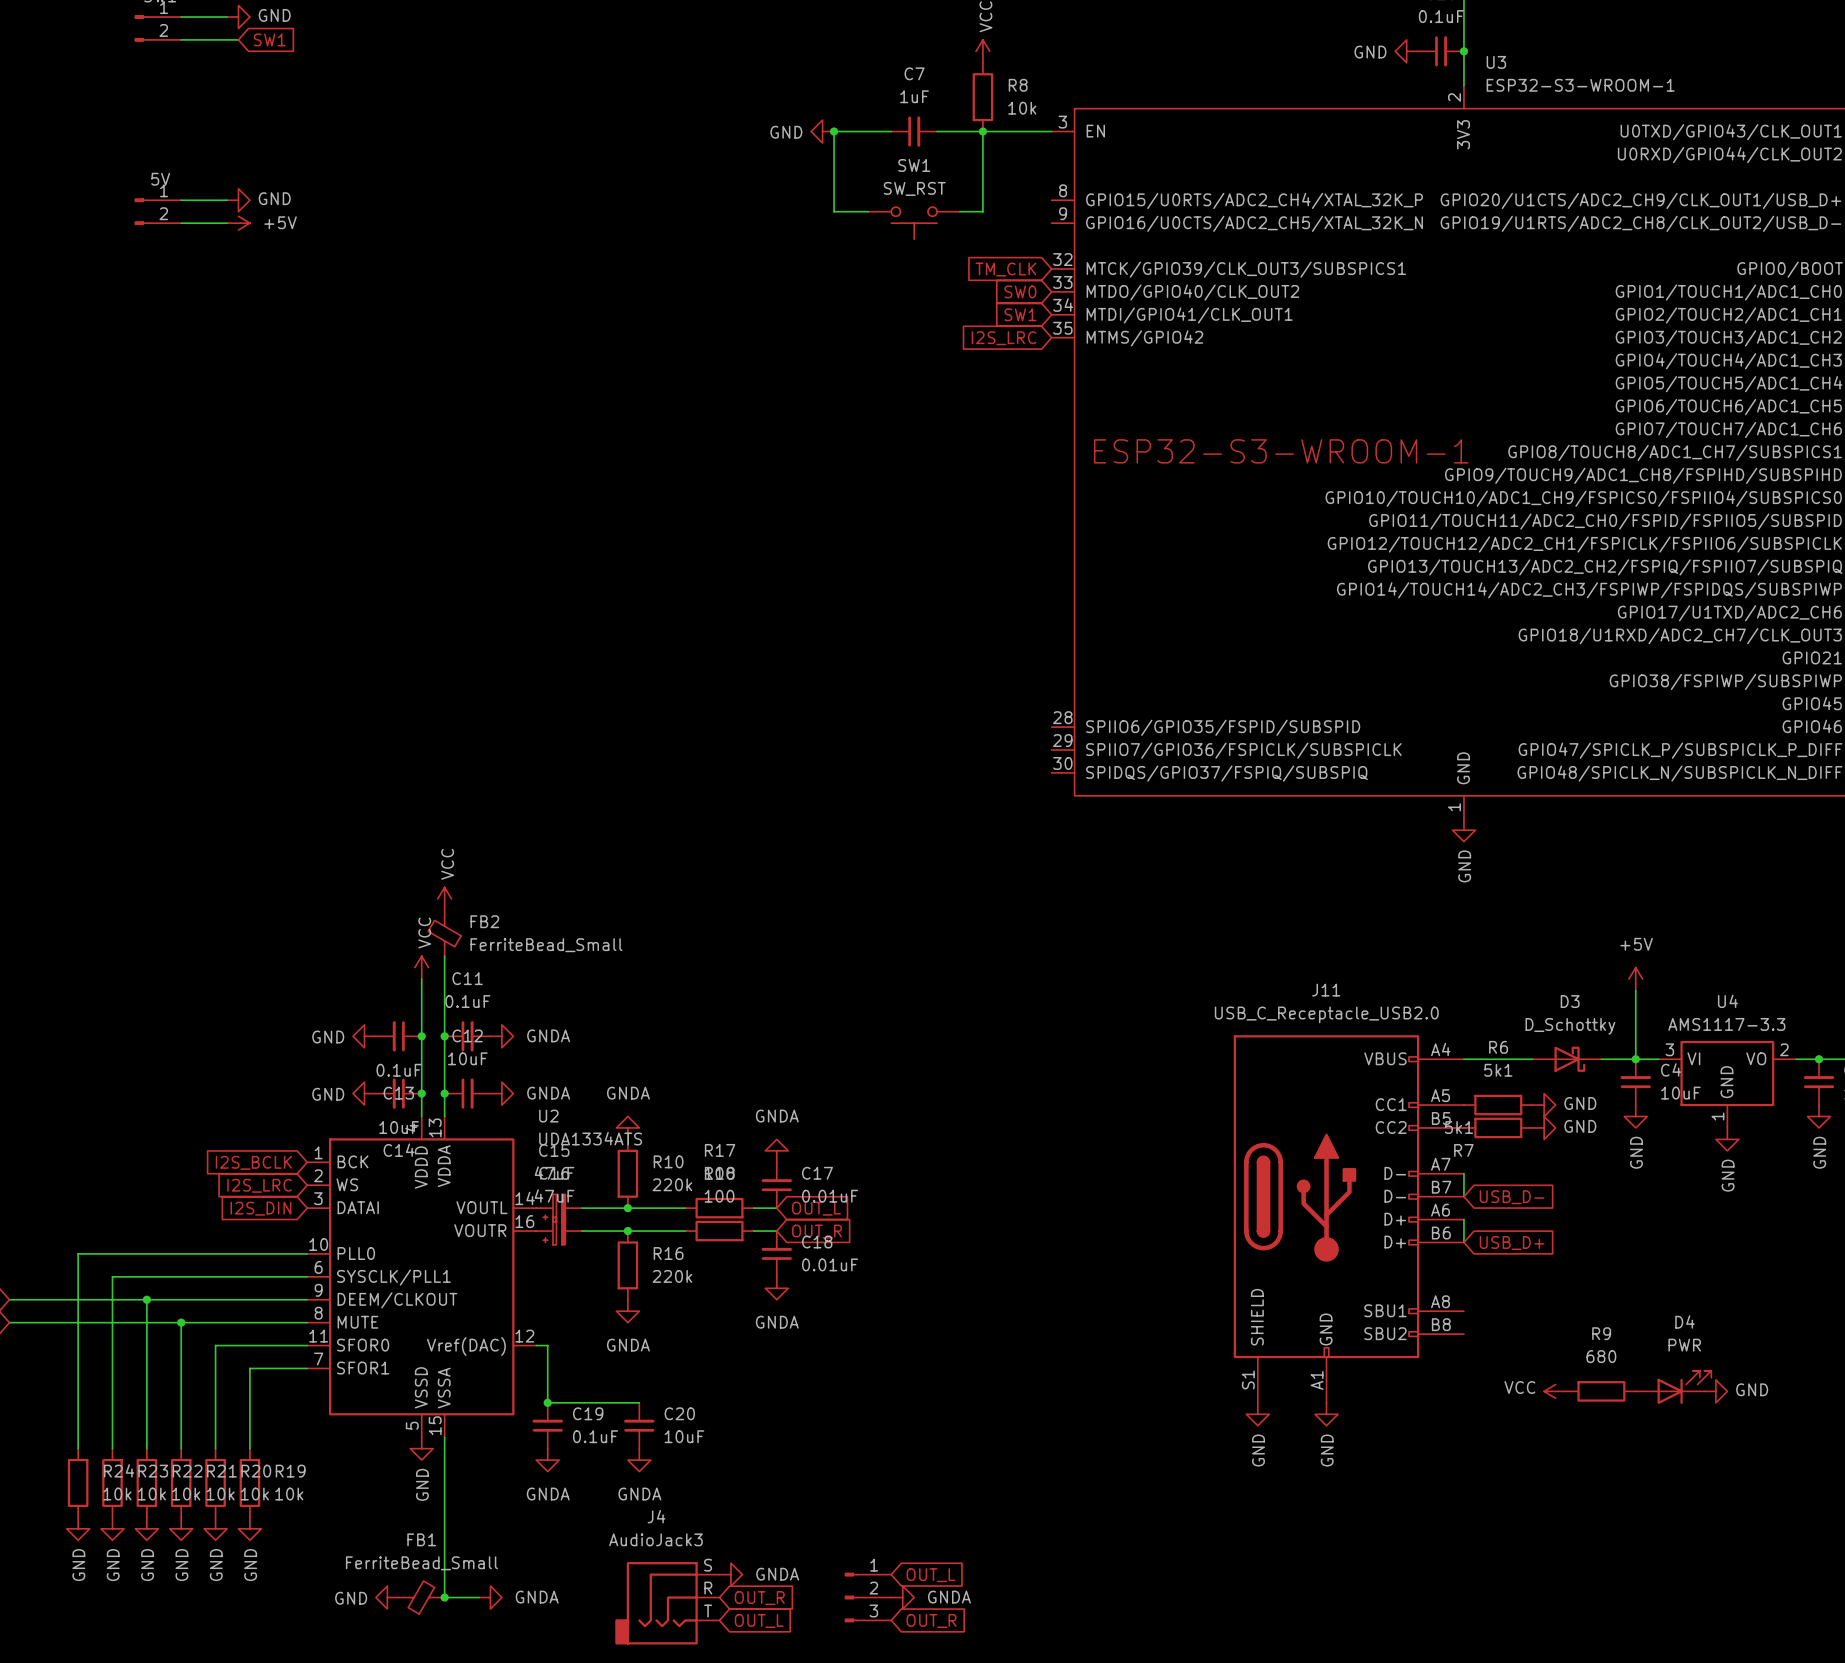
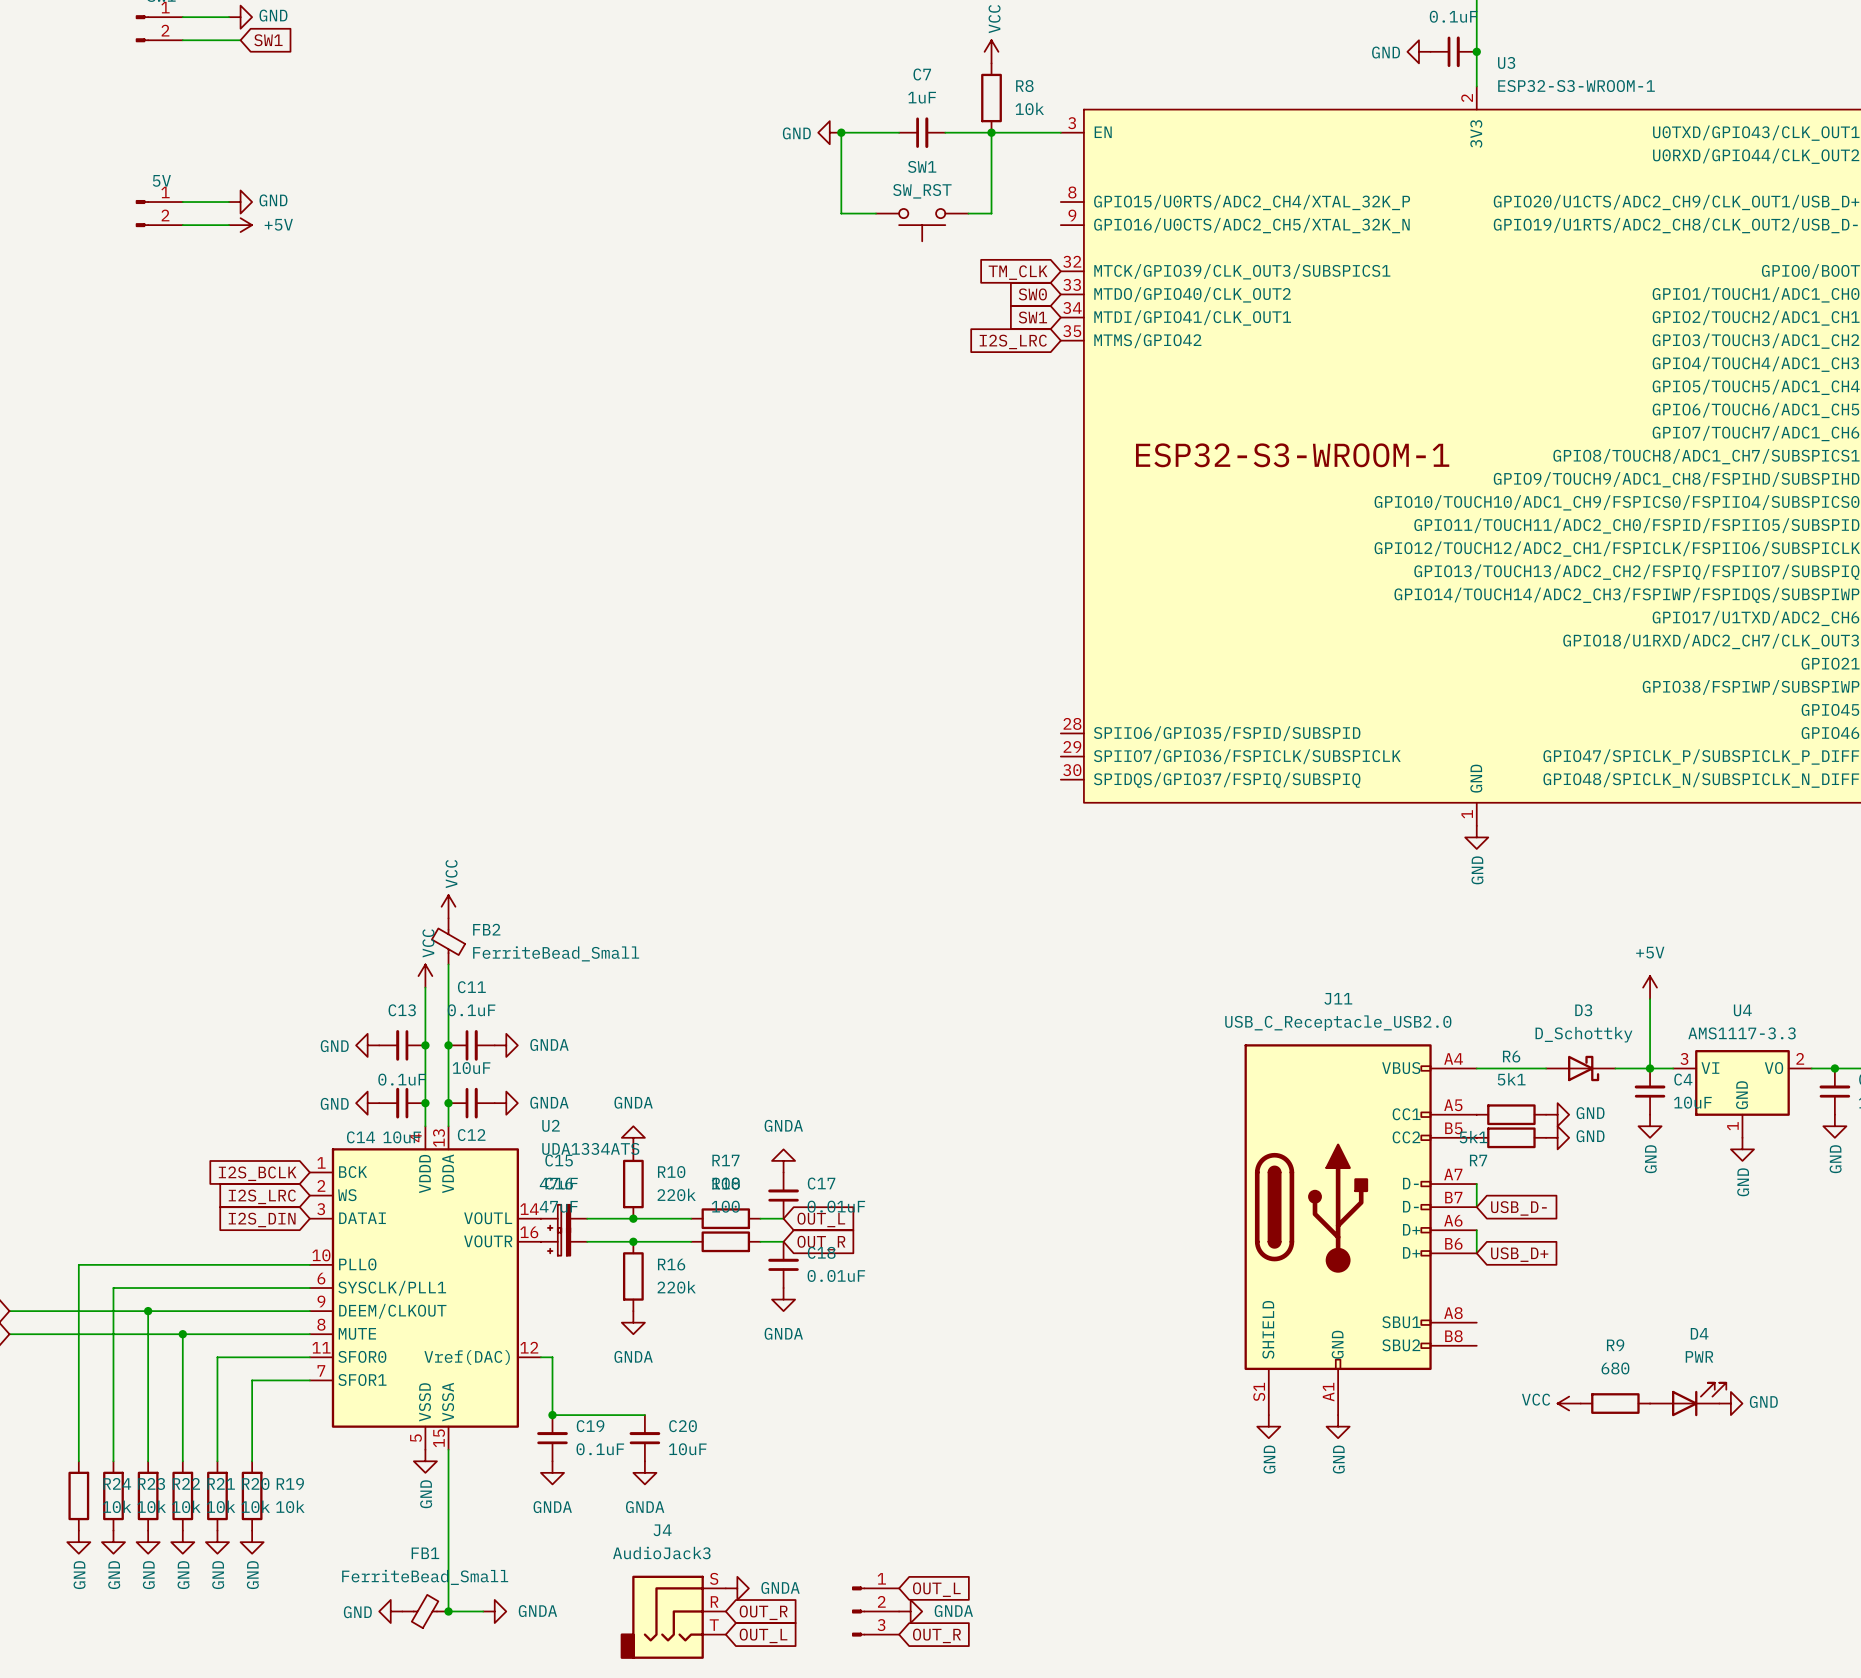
C12 name position: C12 (467, 1035) -> C12 (471, 1135)
C13 name position: C13 (398, 1093) -> C13 (402, 1010)
C14 name position: C14 (399, 1150) -> C14 (360, 1137)

